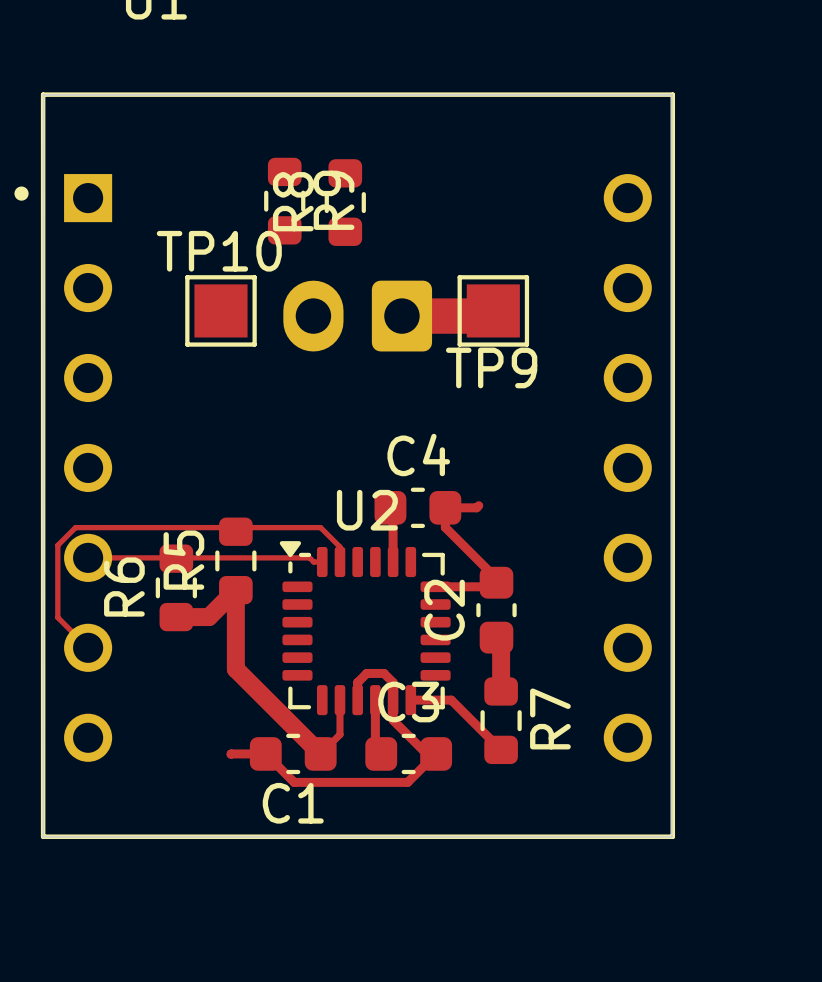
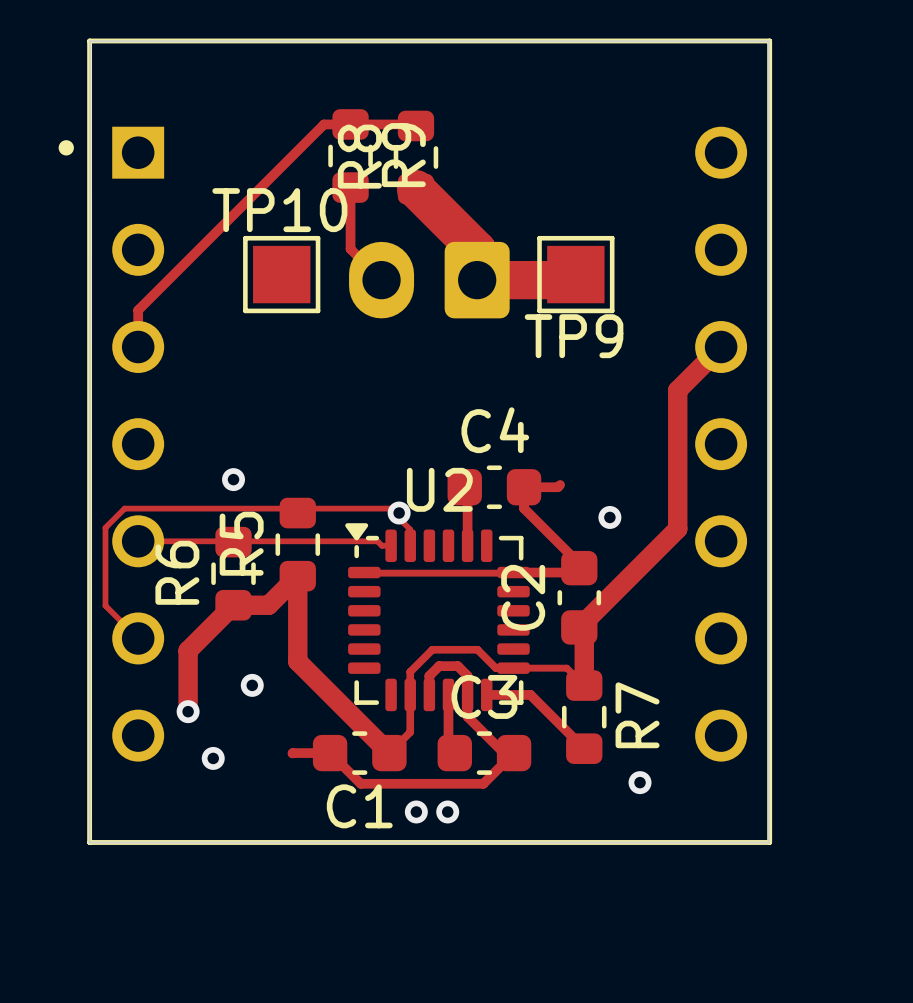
track: none -> (415, 125) (414, 124) (324, 124) (138, 310) (138, 347)
track: none -> (350, 187) (350, 249) (381, 280)
track: none -> (415, 189) (477, 250) (477, 280)
track: none -> (721, 347) (677, 390) (677, 528) (579, 627)
via: none -> (233, 479)
via: none -> (399, 513)
via: none -> (609, 517)
track: none -> (579, 568) (574, 573) (364, 572)
track: none -> (233, 605) (188, 650) (188, 711)
via: none -> (252, 685)
track: none -> (584, 685) (566, 668) (495, 668) (477, 649) (432, 649) (410, 671) (410, 694)
via: none -> (188, 711)
via: none -> (213, 758)
via: none -> (640, 782)
via: none -> (416, 811)
via: none -> (447, 811)

